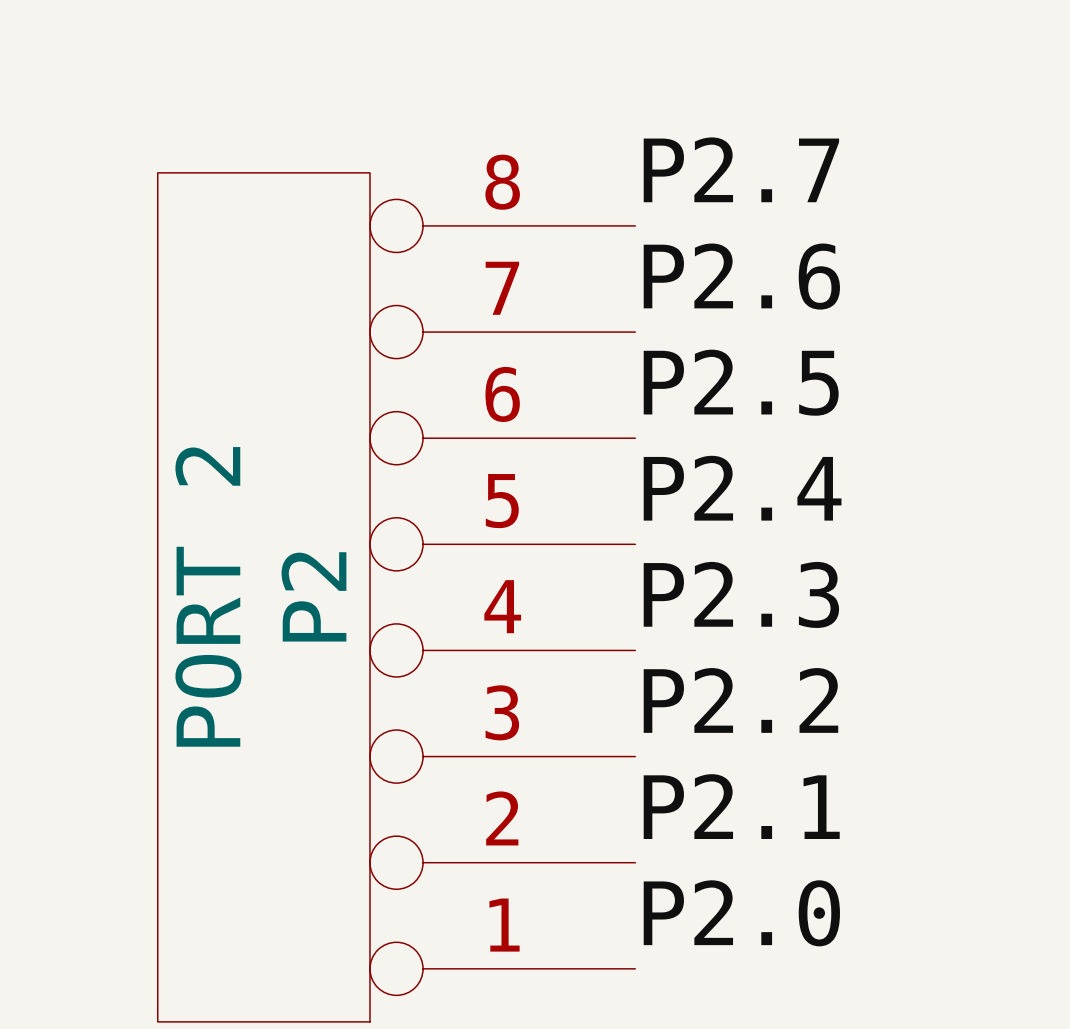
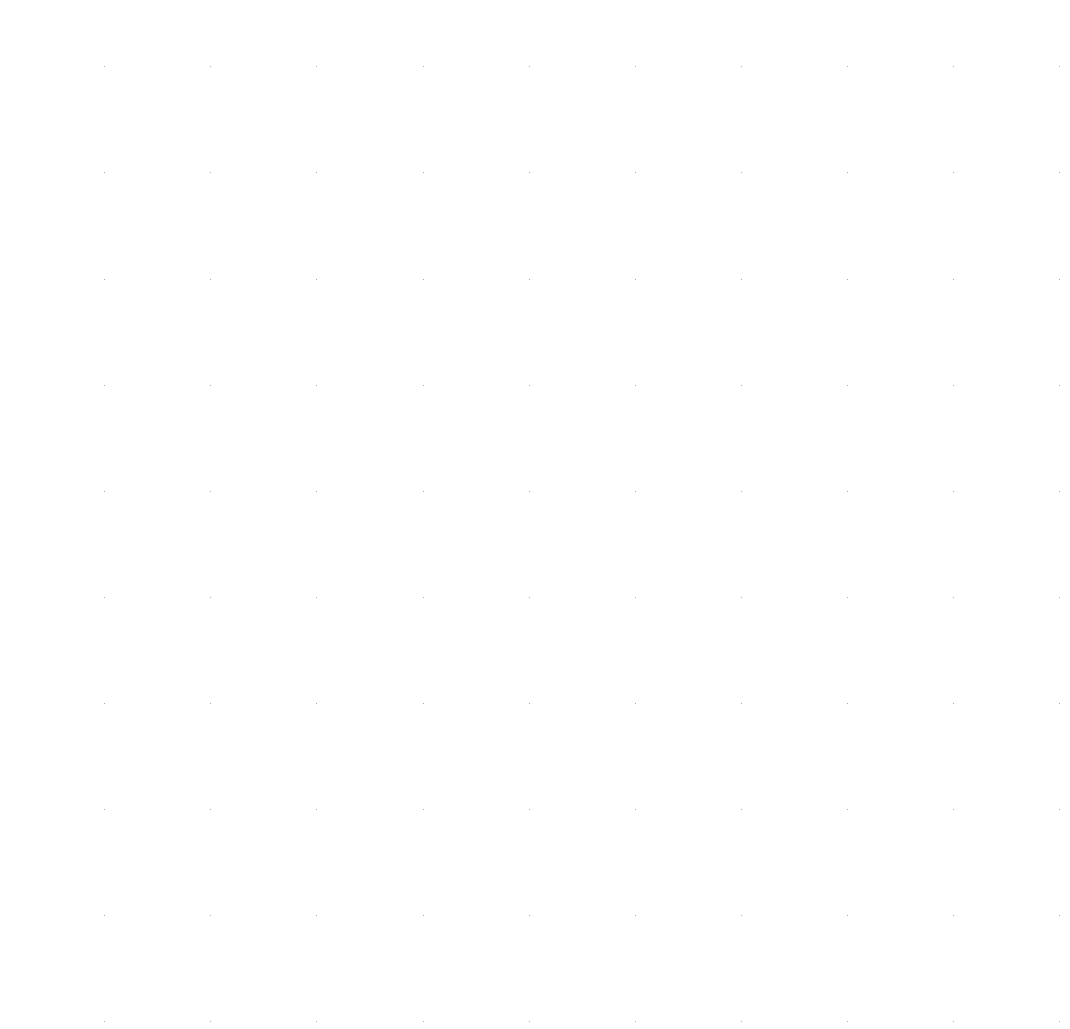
label: P2.7 (741, 169) -> none
label: P2.6 (741, 276) -> none
label: P2.5 (741, 382) -> none
label: P2.4 (742, 488) -> none
label: P2.3 (741, 594) -> none
P2: PORT 2 (396, 597) -> none
label: P2.2 (740, 700) -> none
label: P2.1 (741, 806) -> none
label: P2.0 (741, 913) -> none

